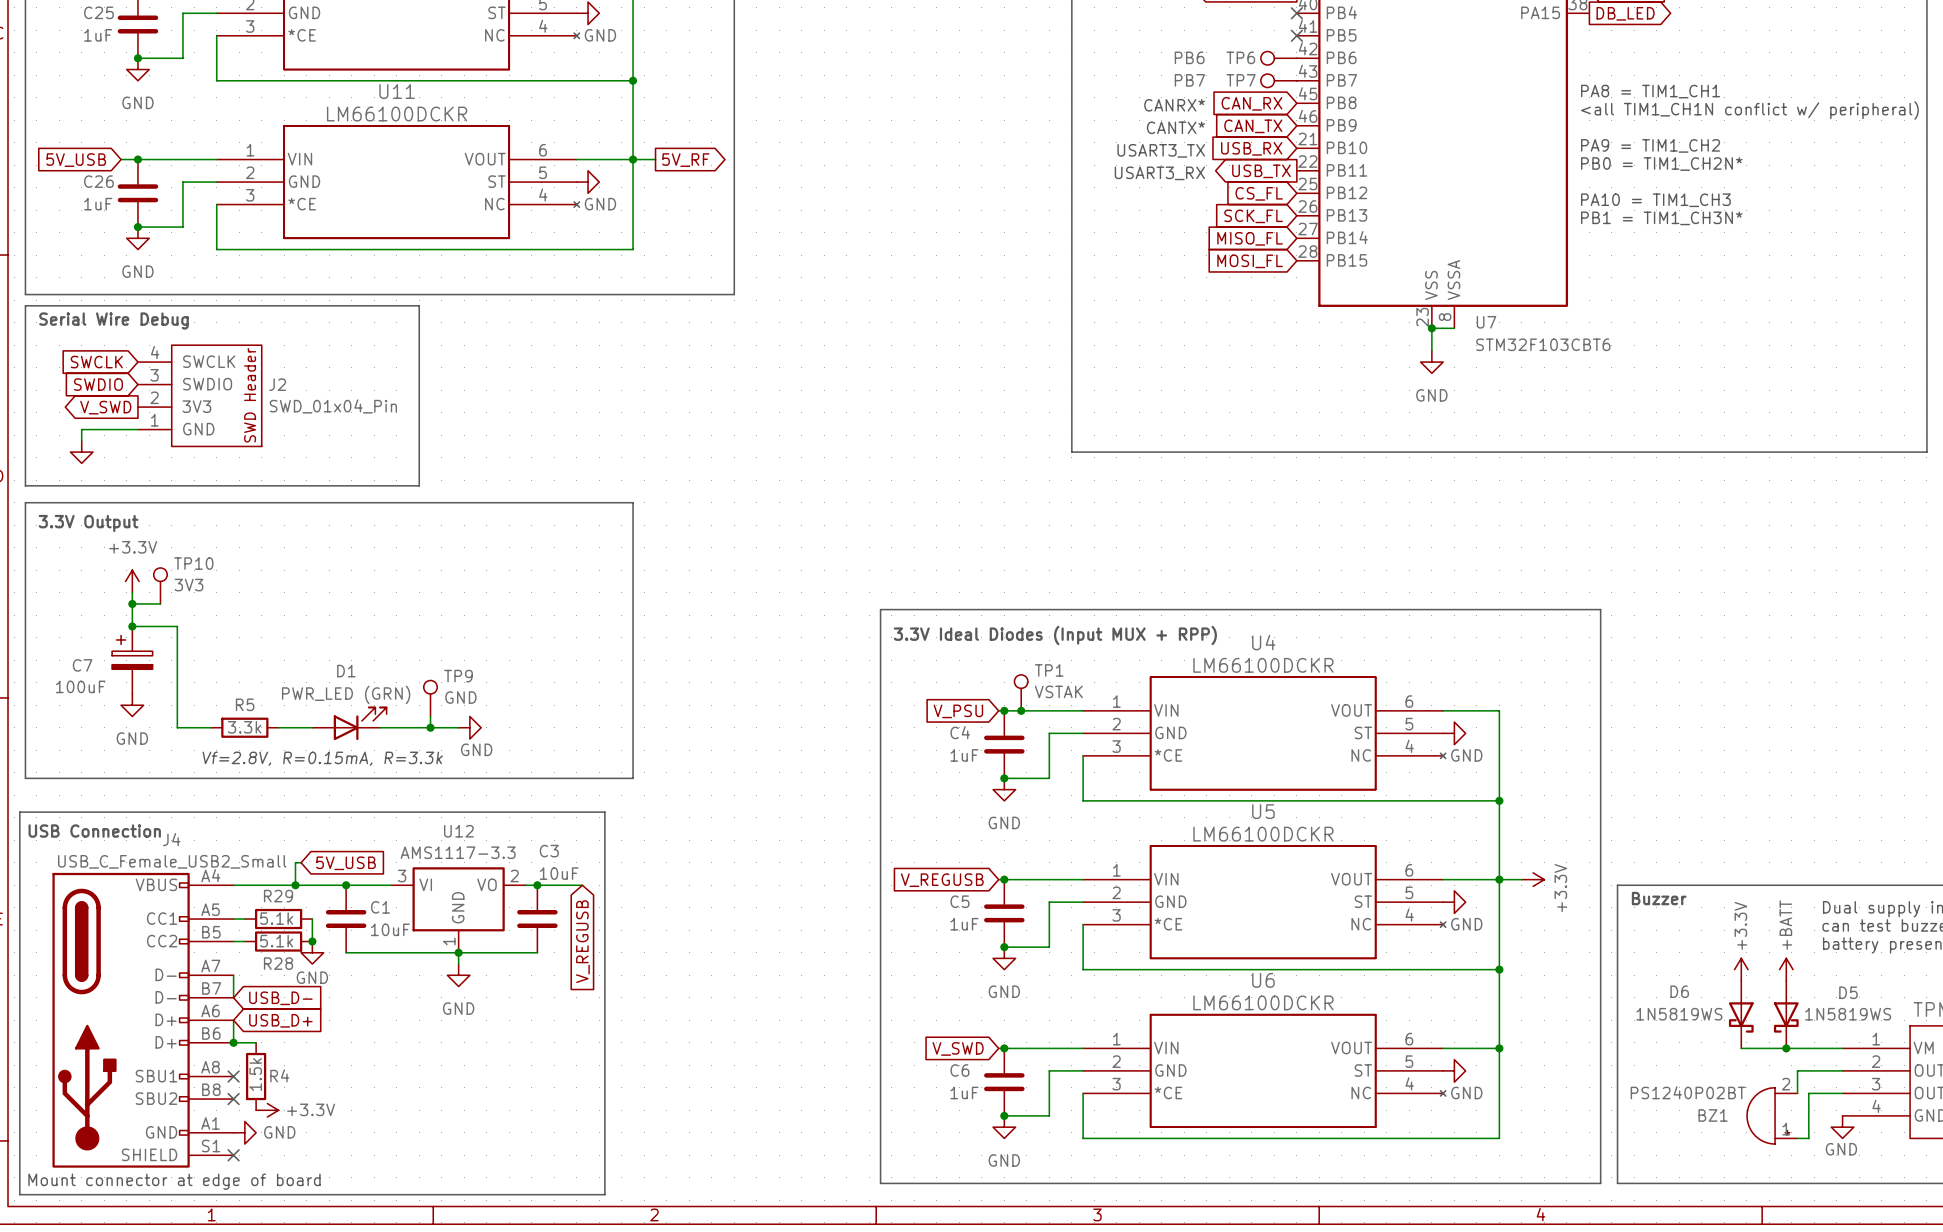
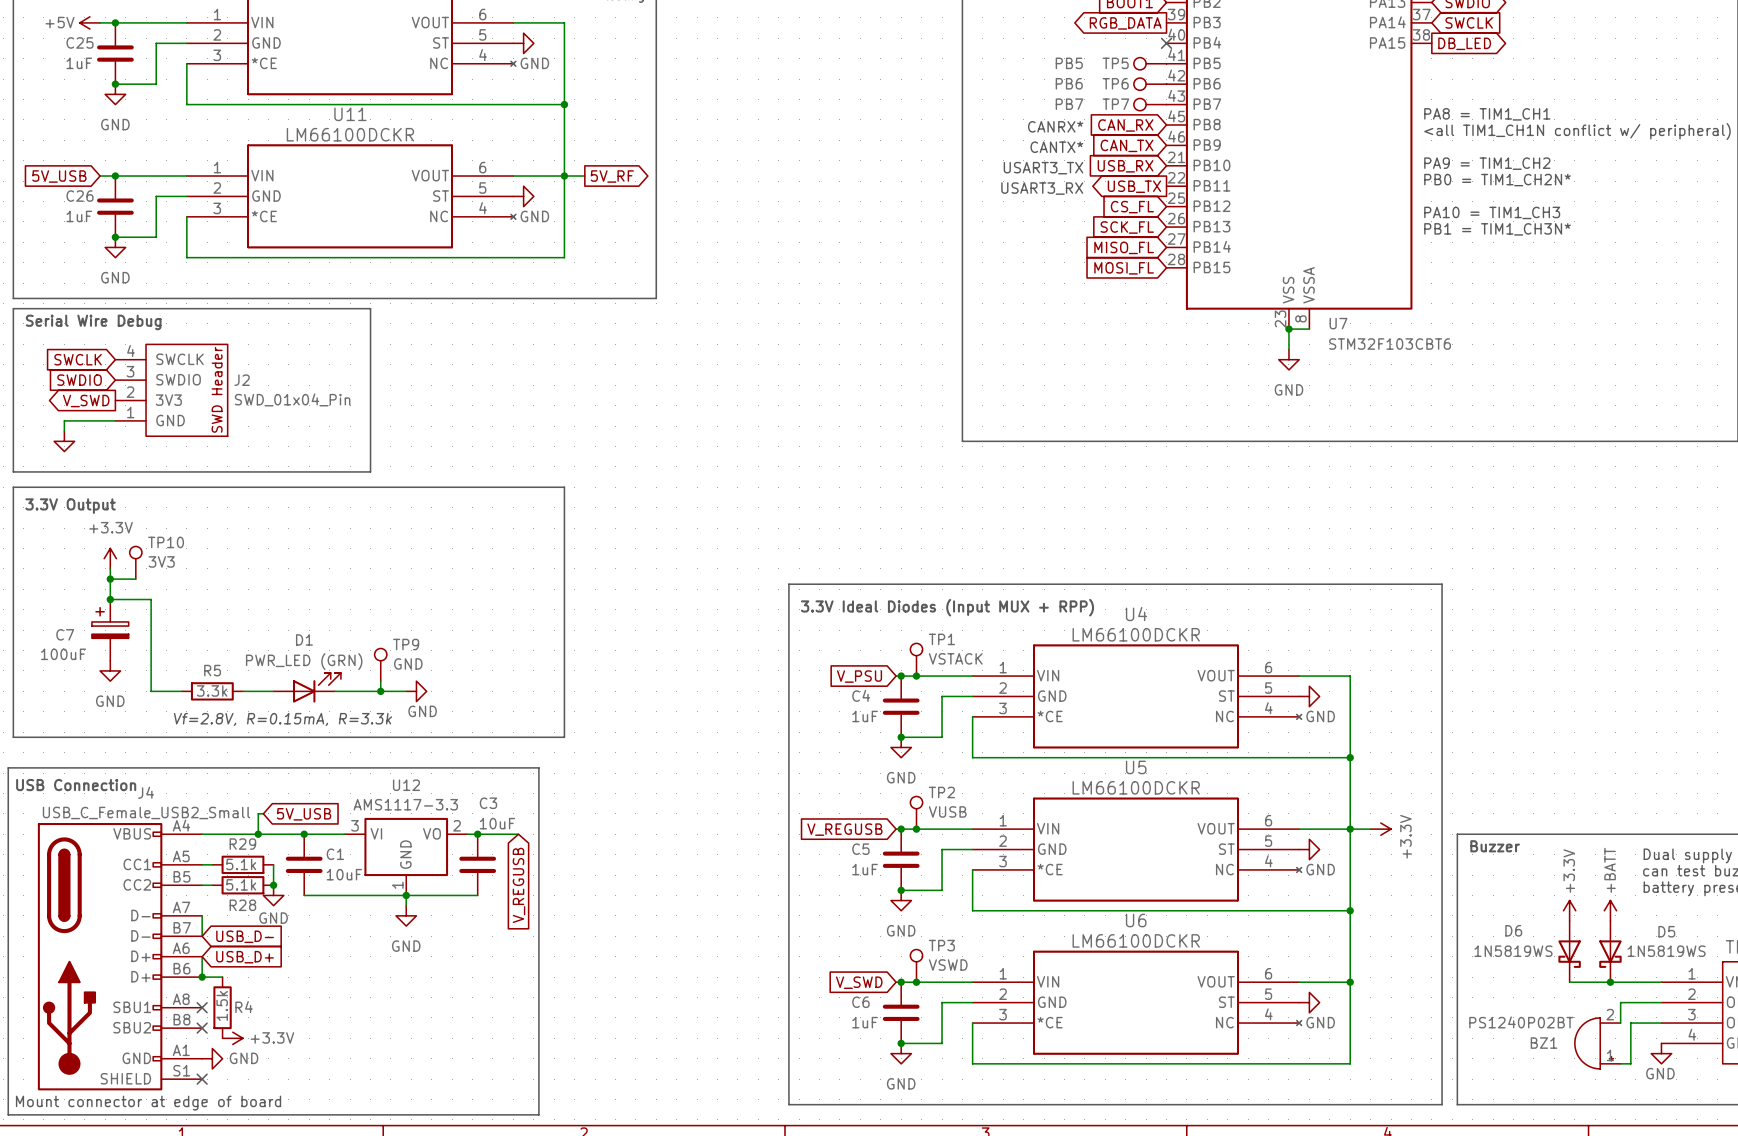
TP5: none -> PB5 (1150, 63)
no-connect mark: (1296, 35) -> none
TP1 value: VSTAK (1058, 691) -> VSTACK (955, 658)
TP2: none -> VUSB (916, 812)
junction: none -> (916, 829)
TP3: none -> VSWD (916, 965)
junction: none -> (916, 982)

